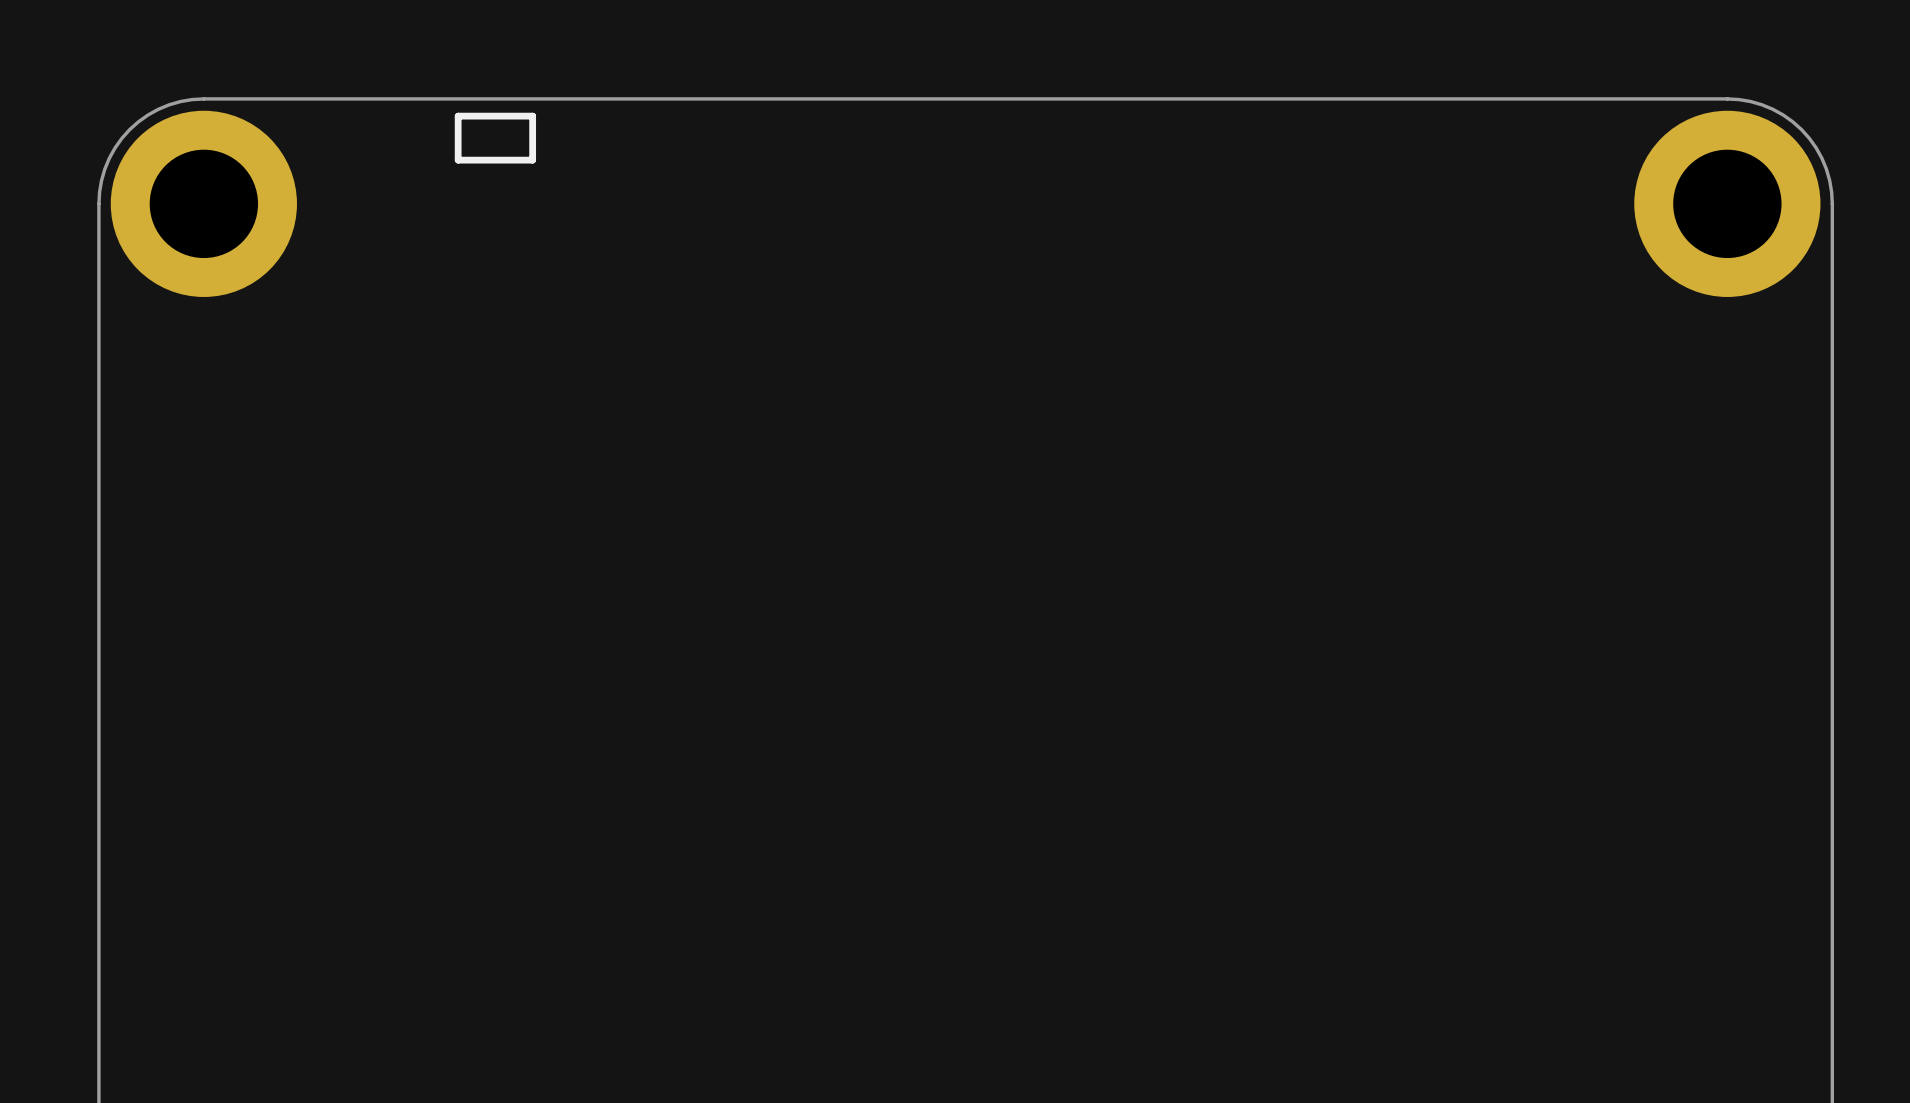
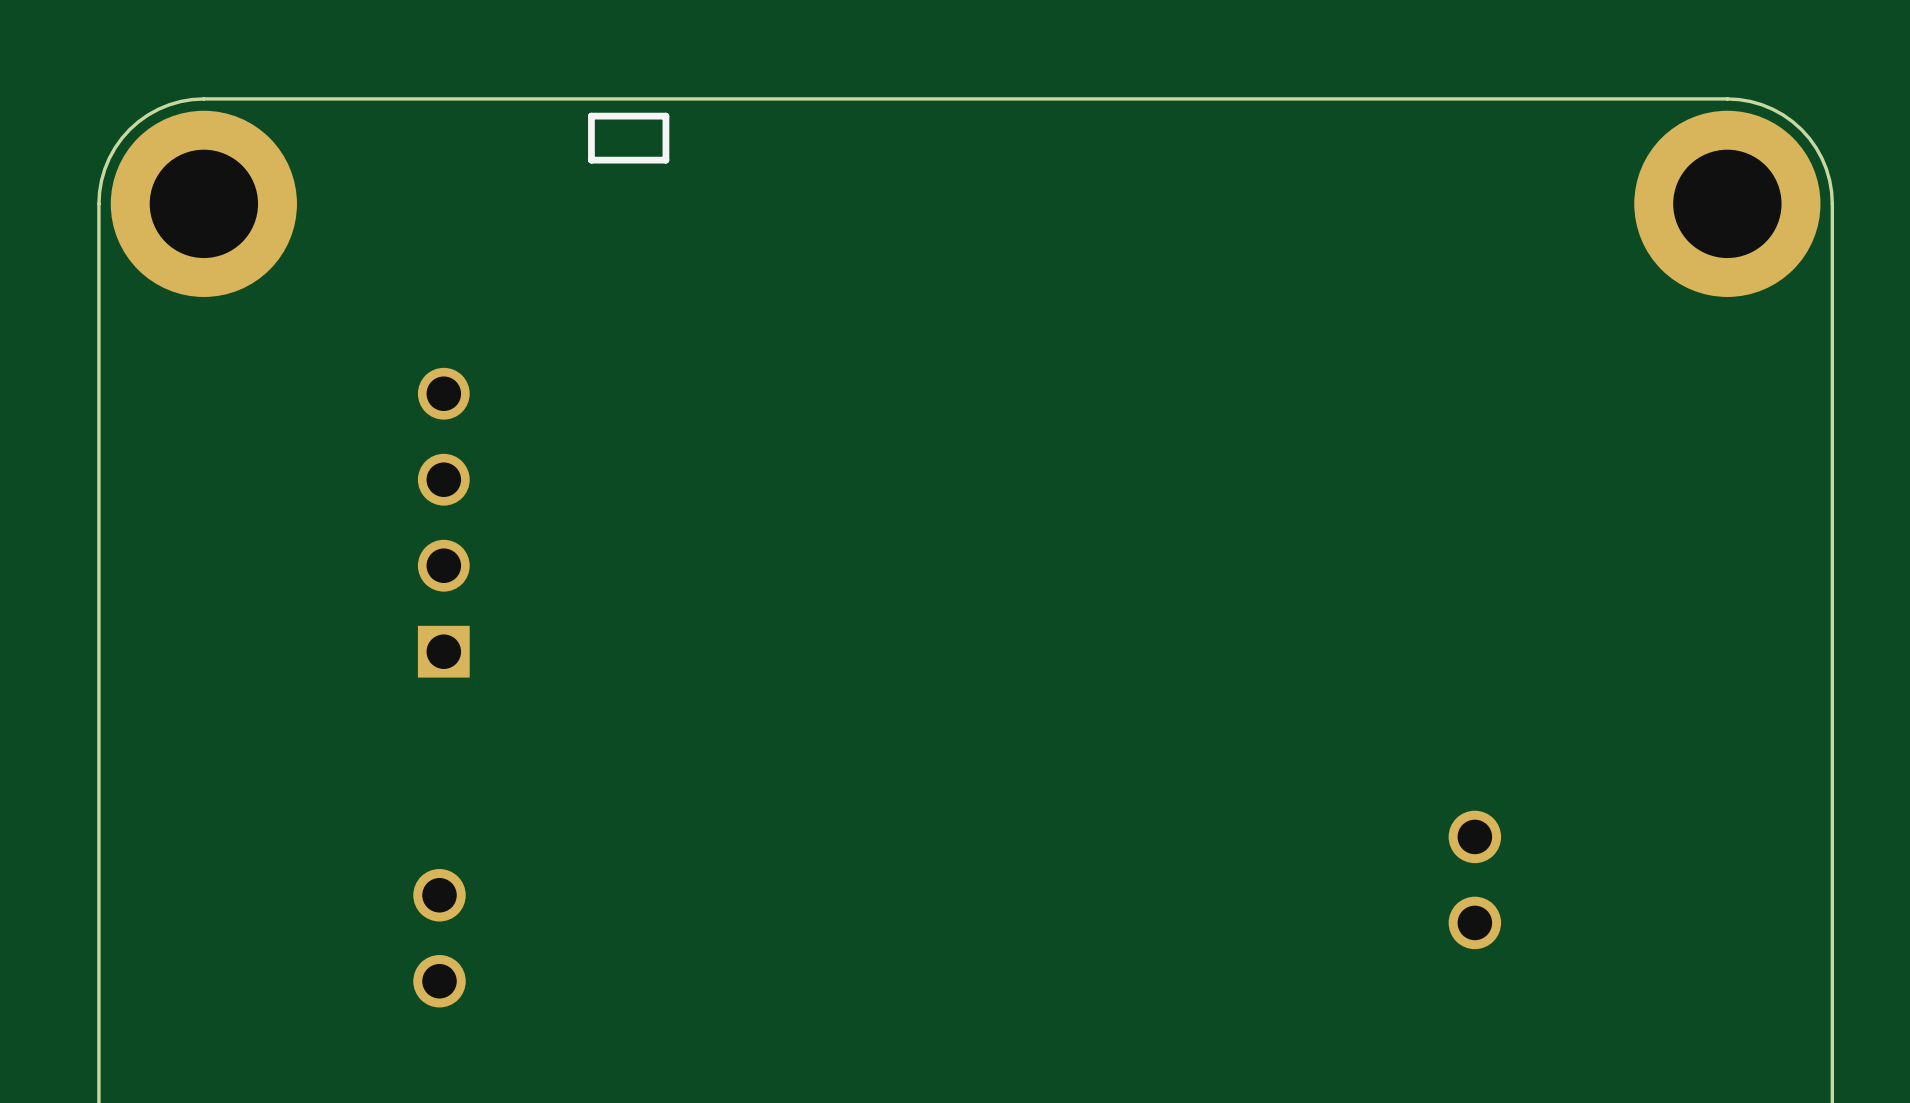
line: (532, 116) (532, 160) (458, 160) (458, 116) (532, 116) -> (665, 116) (665, 160) (591, 160) (591, 116) (665, 116)
part: none -> (443, 522)
part: none -> (1474, 879)
part: none -> (439, 938)

